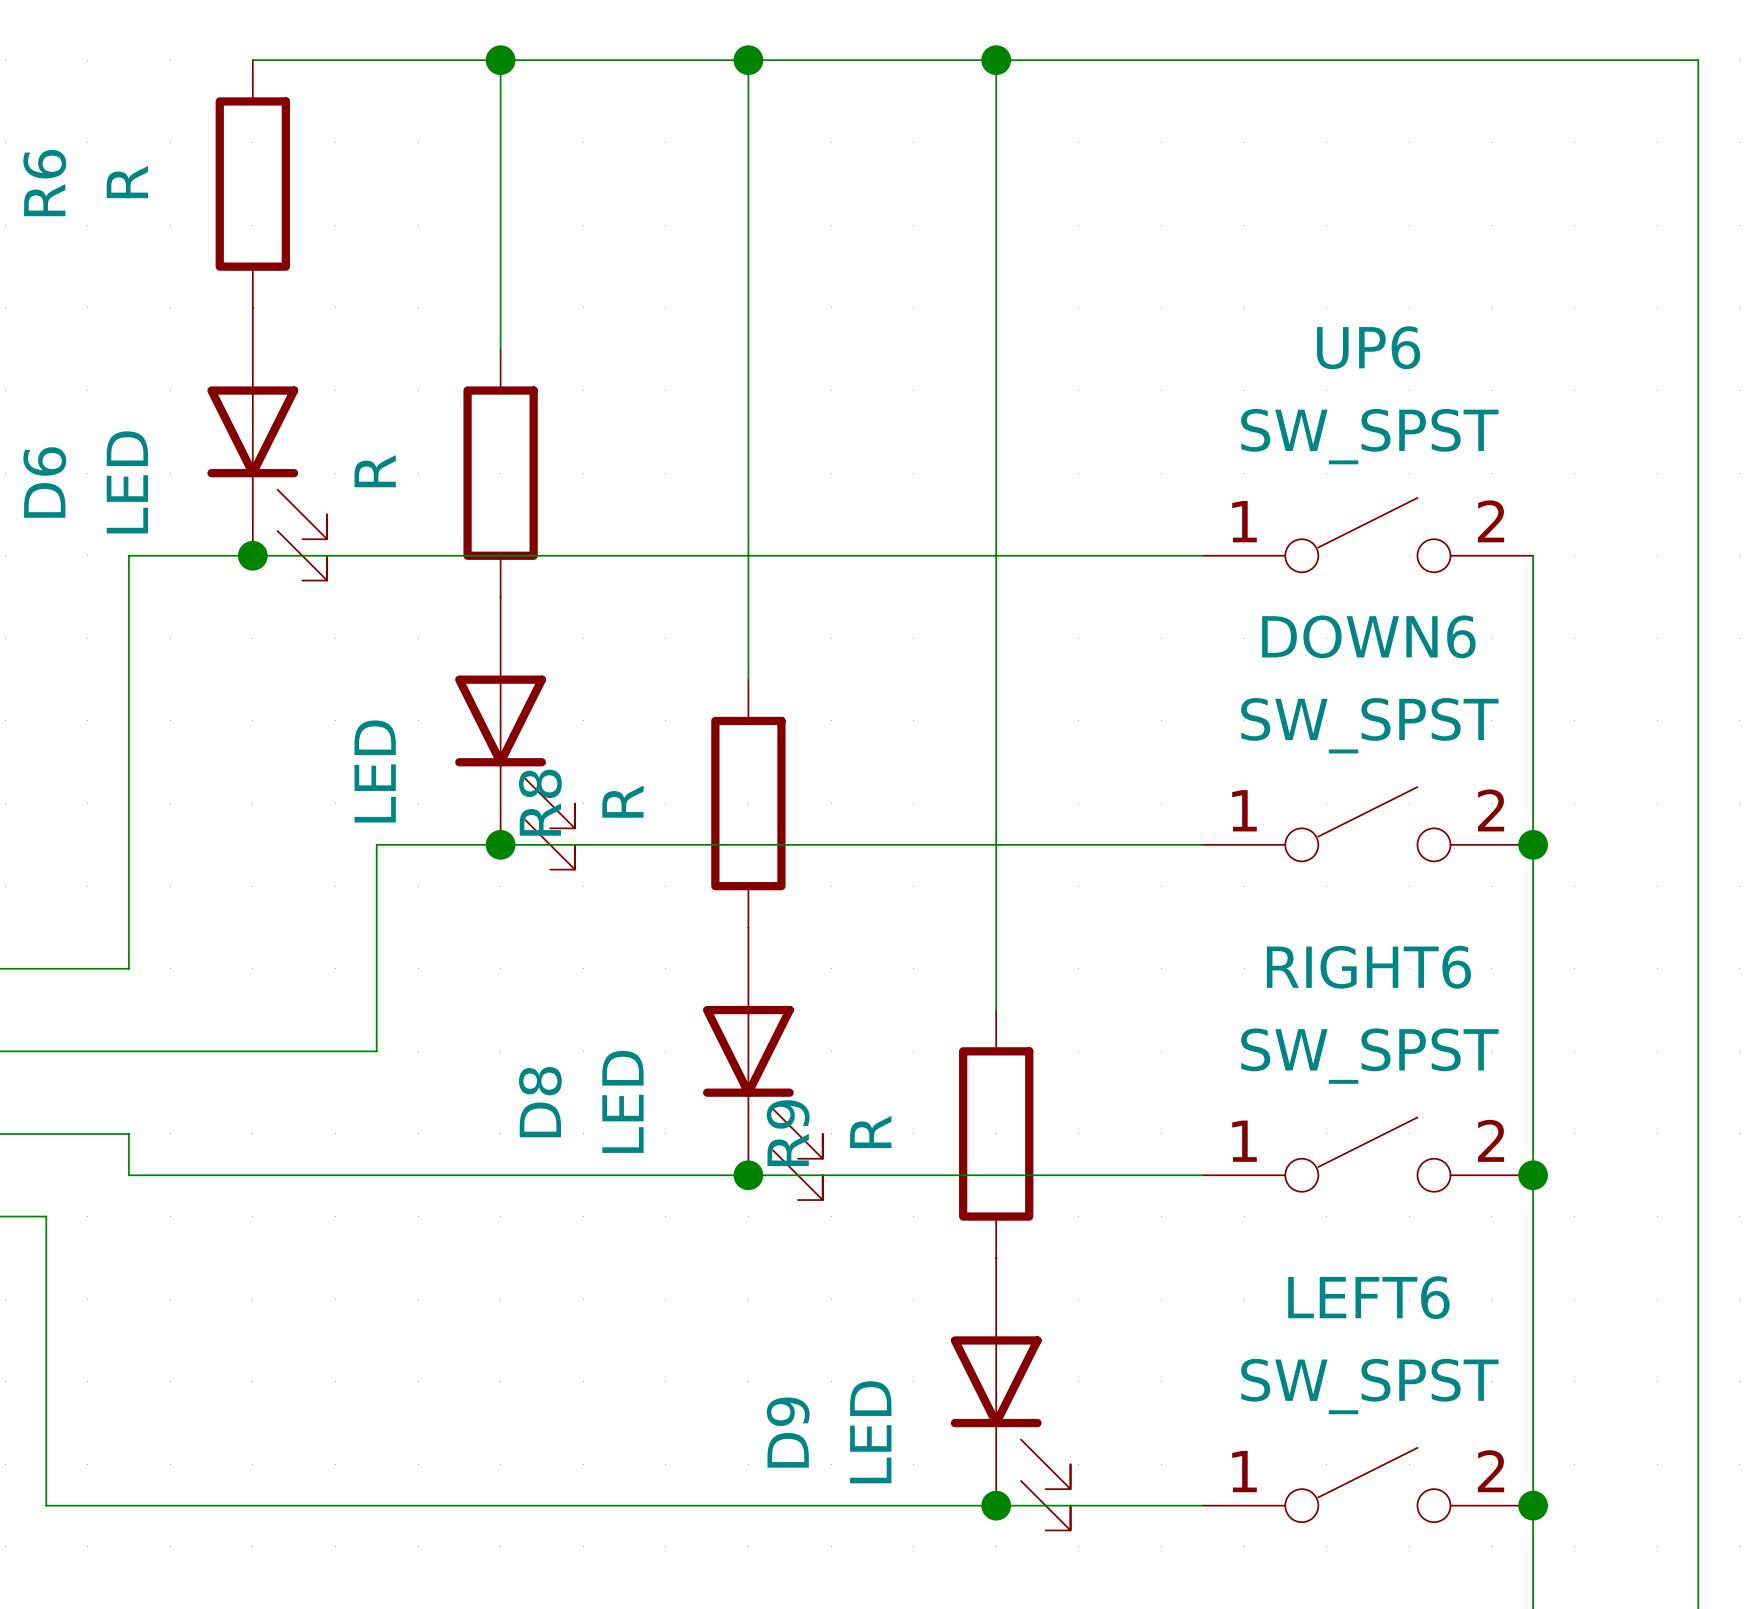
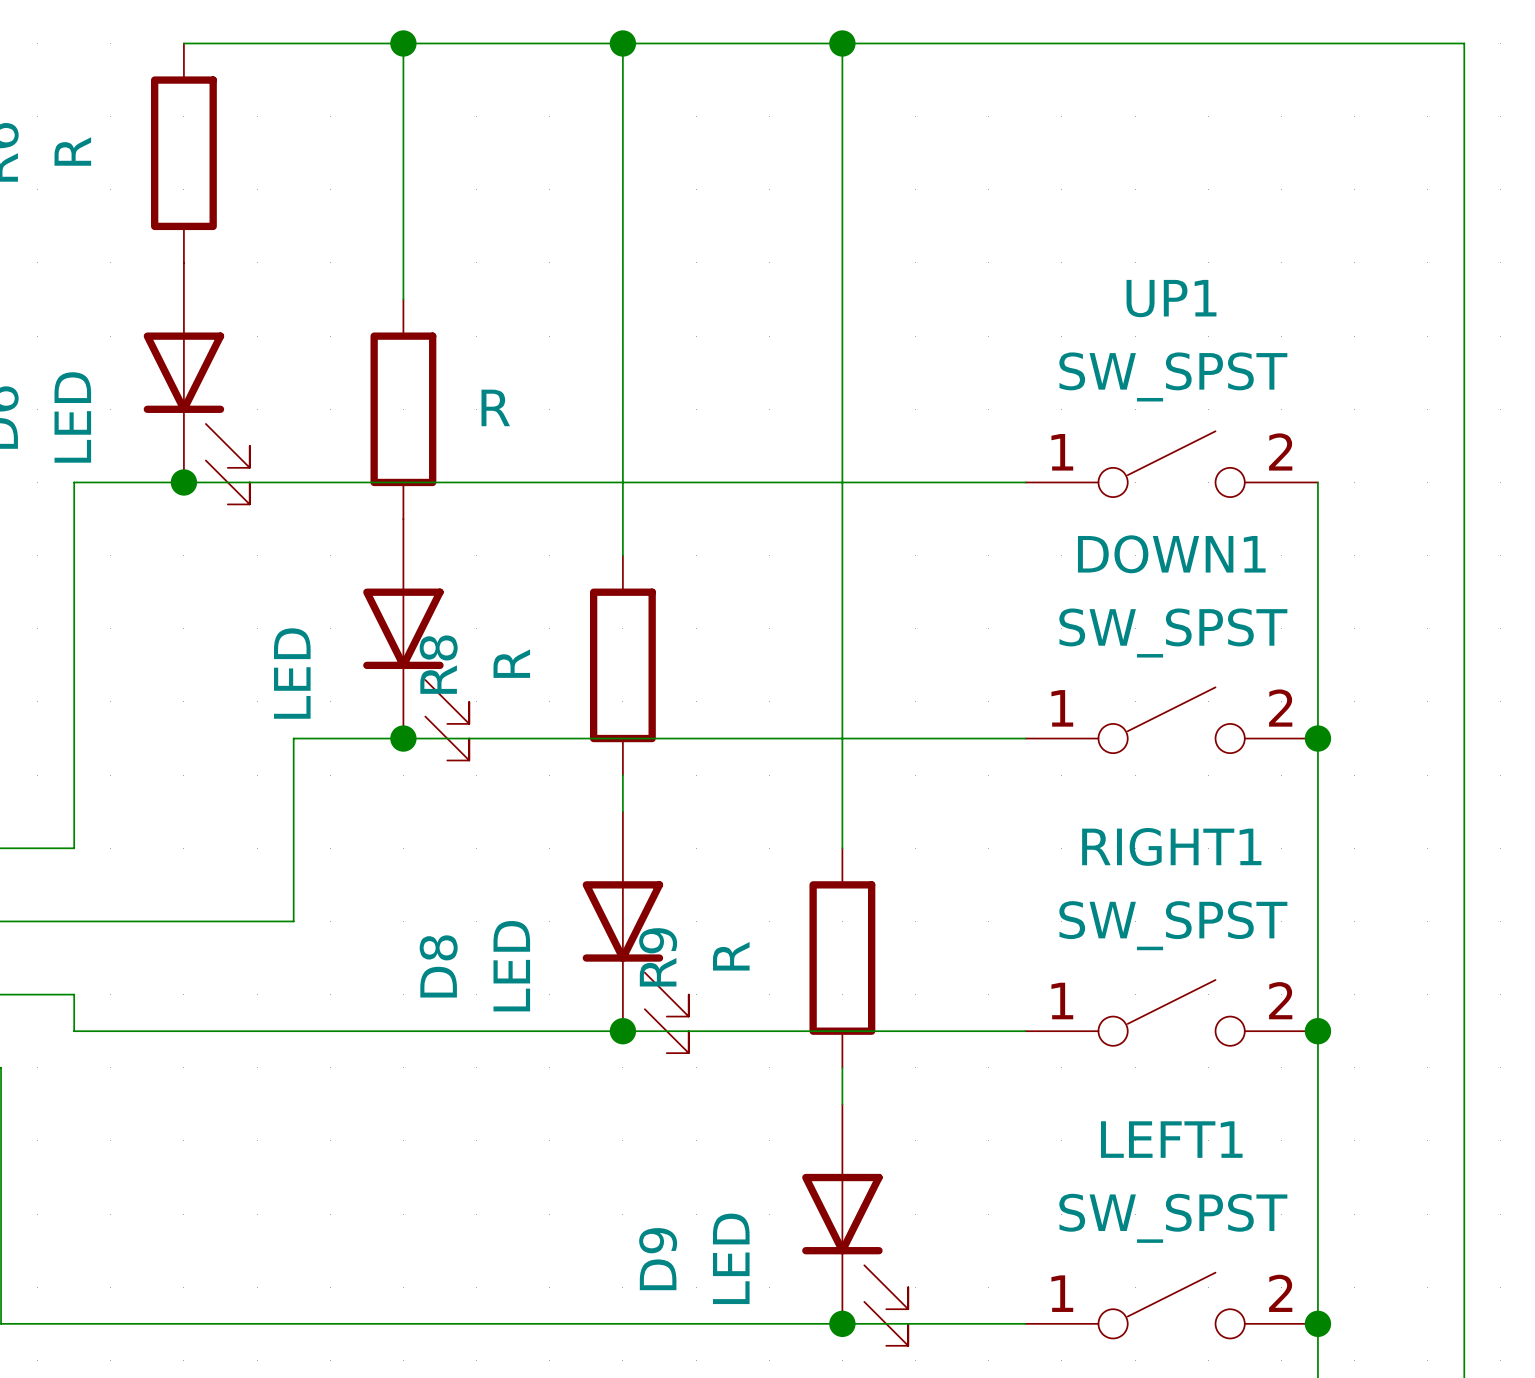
UP6 name: UP6 (1368, 347) -> UP1 (1171, 298)
part value rotation: 0° (375, 471) -> 90° clockwise (495, 407)
part value position: R (375, 471) -> R (495, 407)
DOWN6 name: DOWN6 (1368, 636) -> DOWN1 (1171, 554)
R8 position: (748, 803) -> (622, 665)
RIGHT6 name: RIGHT6 (1368, 967) -> RIGHT1 (1171, 846)
R9 position: (996, 1133) -> (842, 958)
LEFT6 name: LEFT6 (1368, 1297) -> LEFT1 (1171, 1139)

